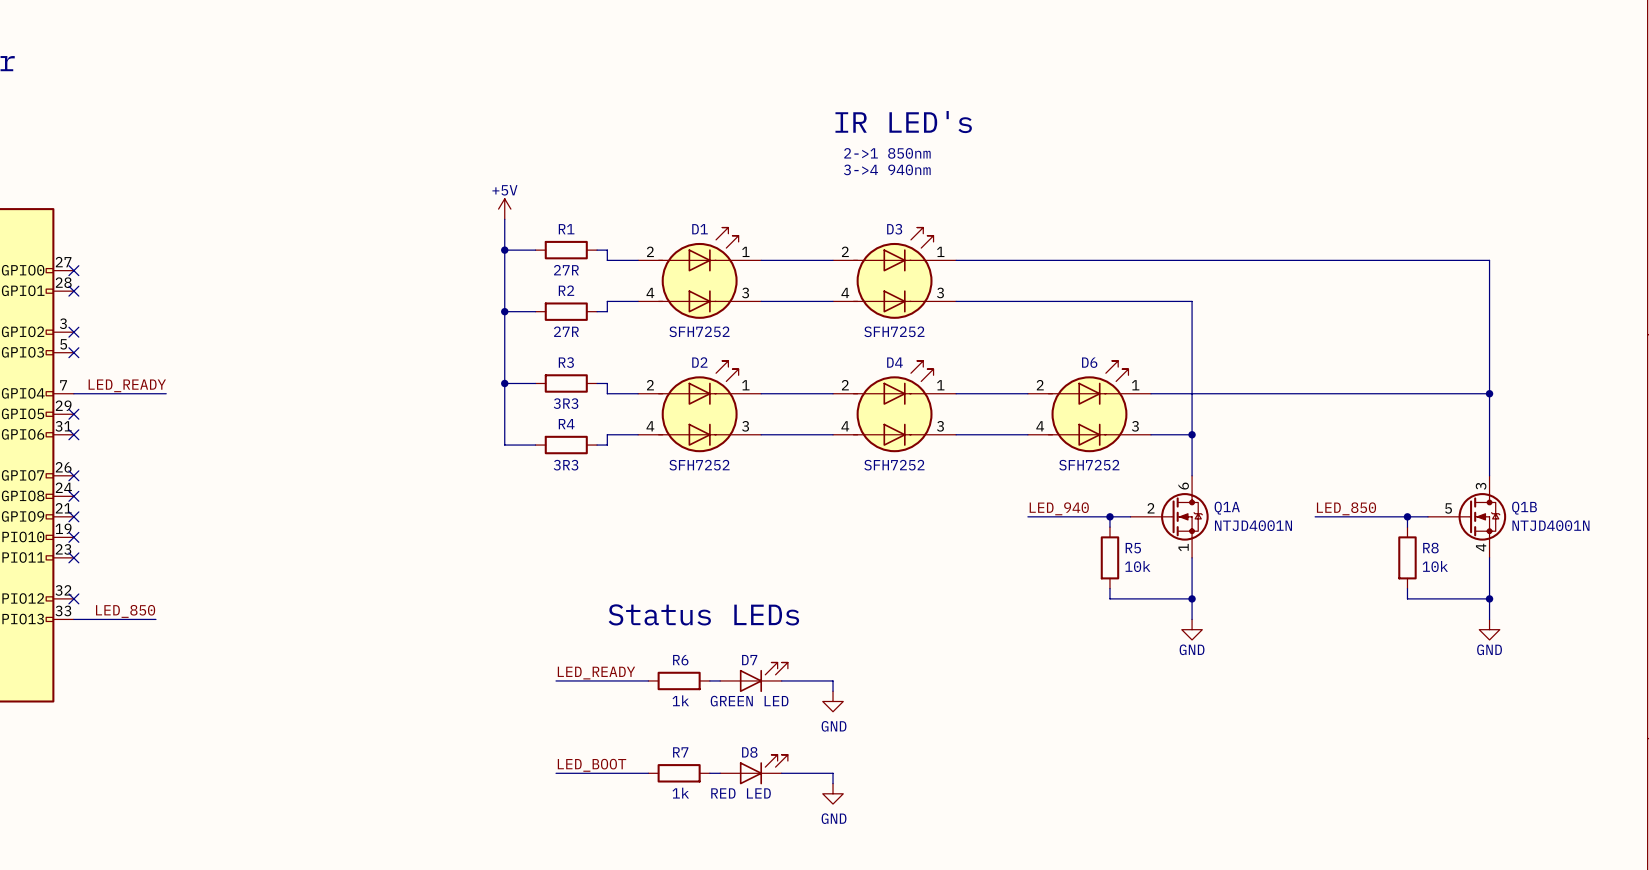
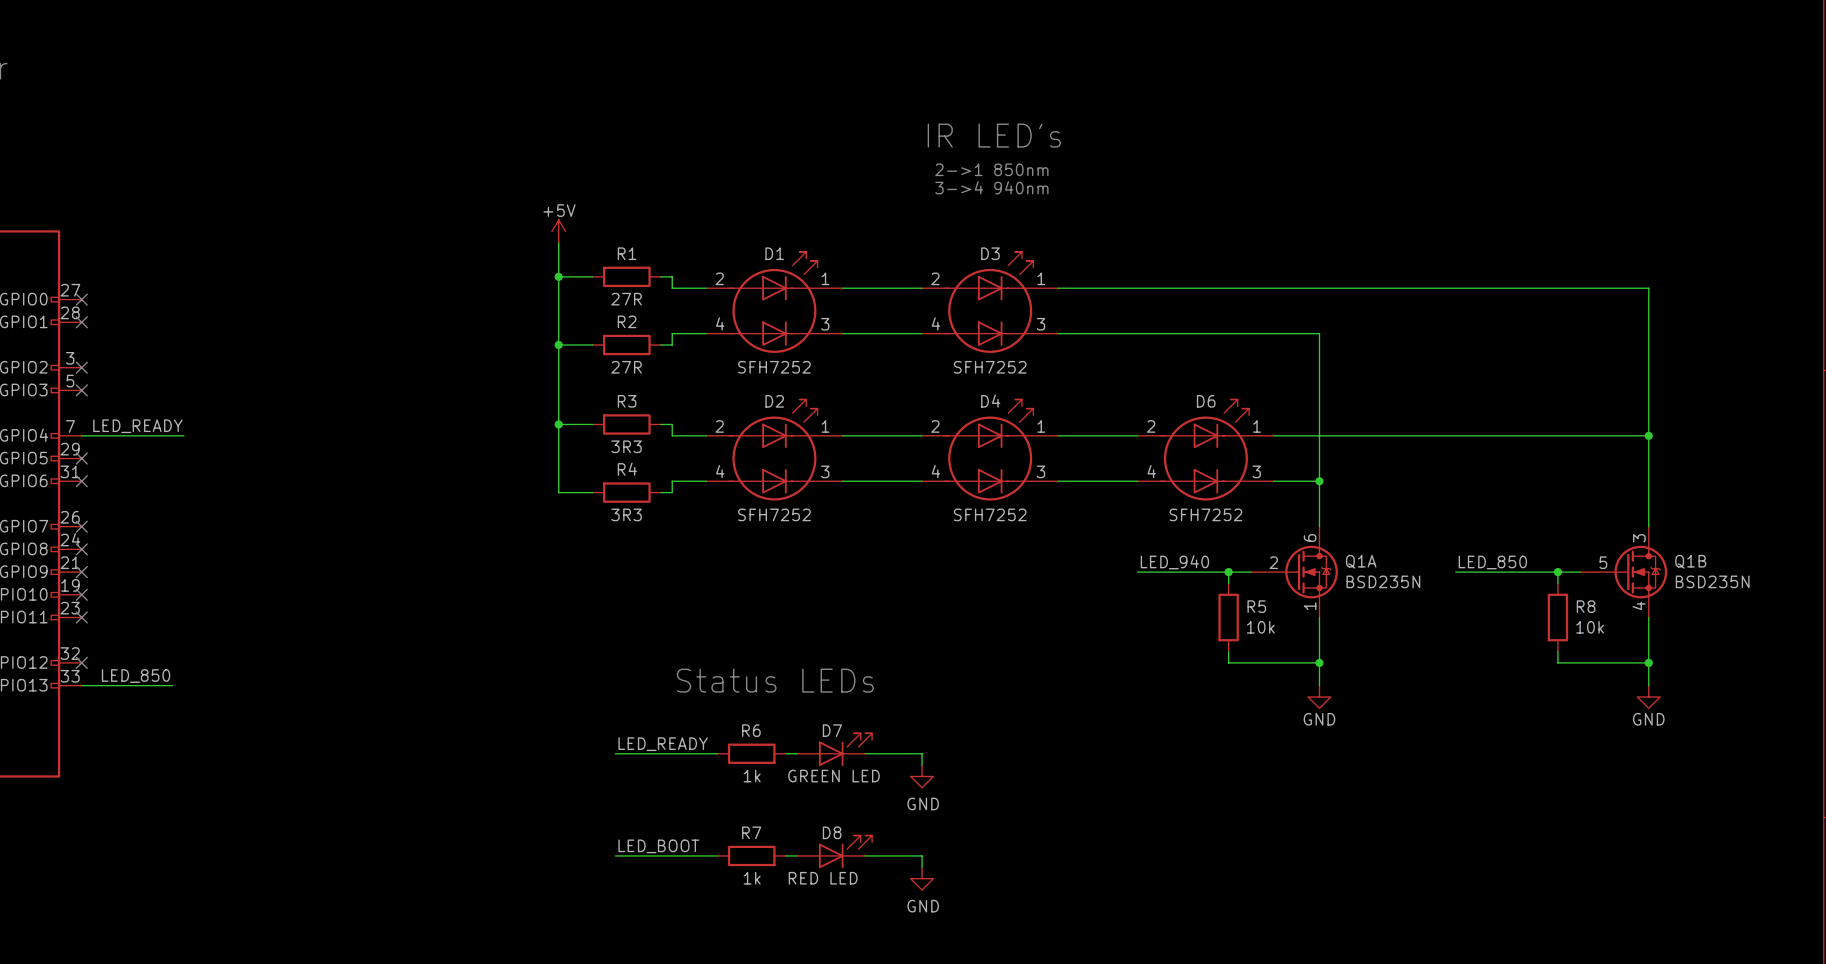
Q1A value: NTJD4001N (1253, 525) -> BSD235N (1383, 581)
Q1B value: NTJD4001N (1550, 525) -> BSD235N (1712, 581)

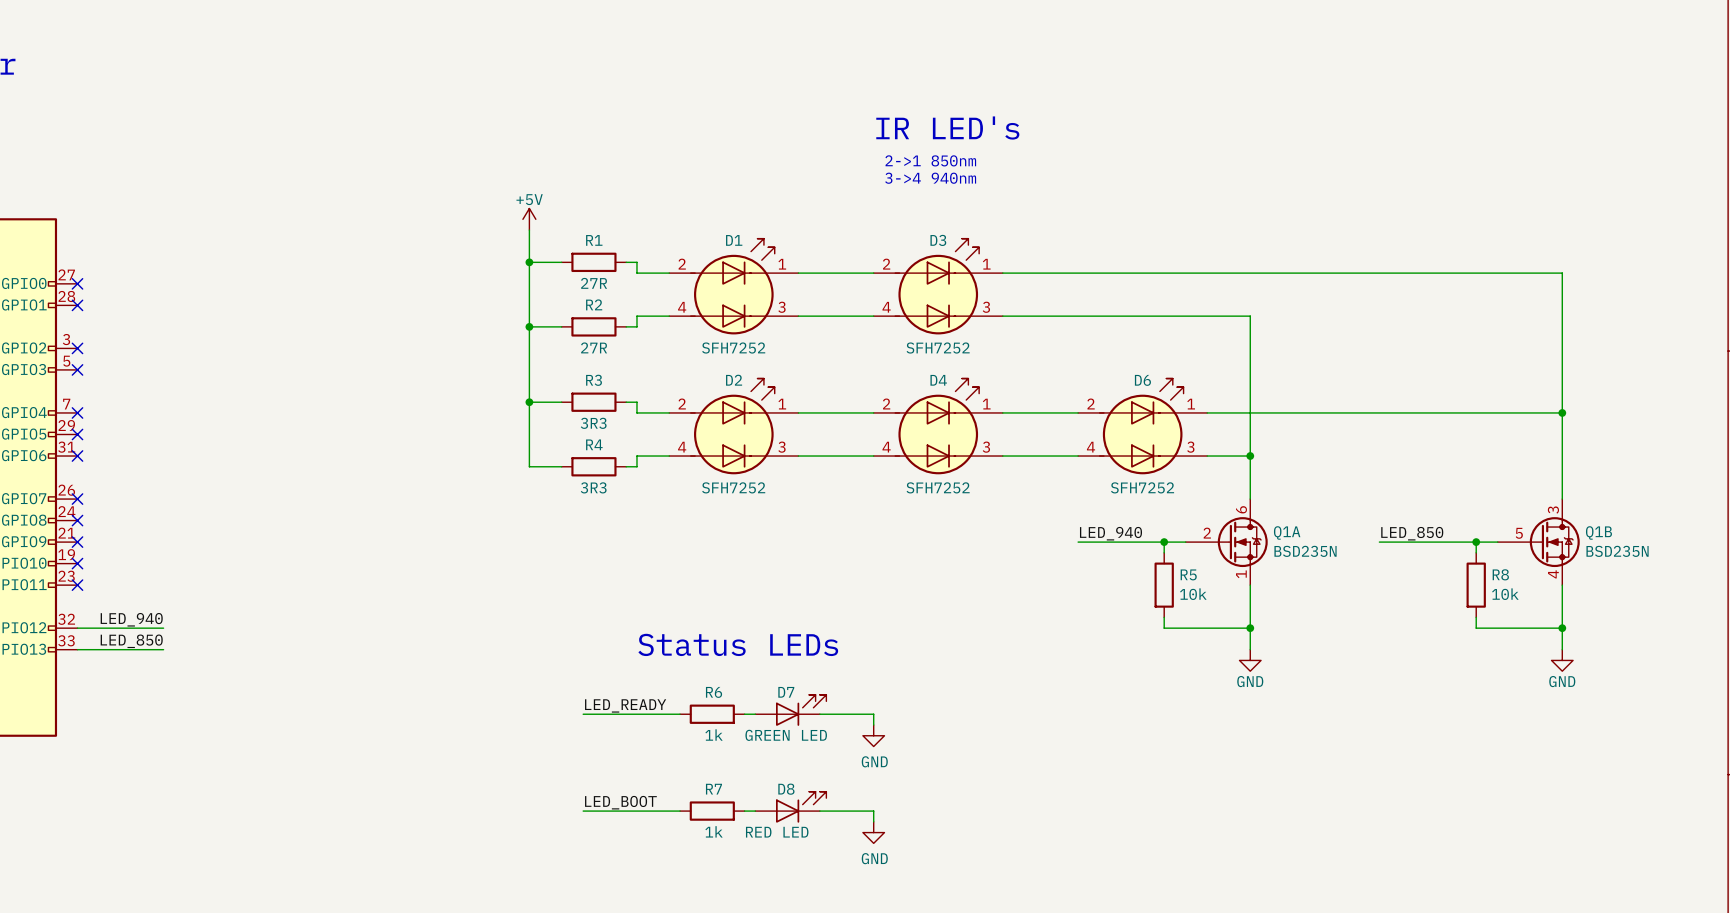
label: LED_READY (137, 426) -> none
wire: (81, 435) (183, 435) -> none
no-connect mark: none -> (77, 412)
label: none -> LED_940 (131, 619)
wire: none -> (77, 628) (163, 628)
no-connect mark: (81, 662) -> none

